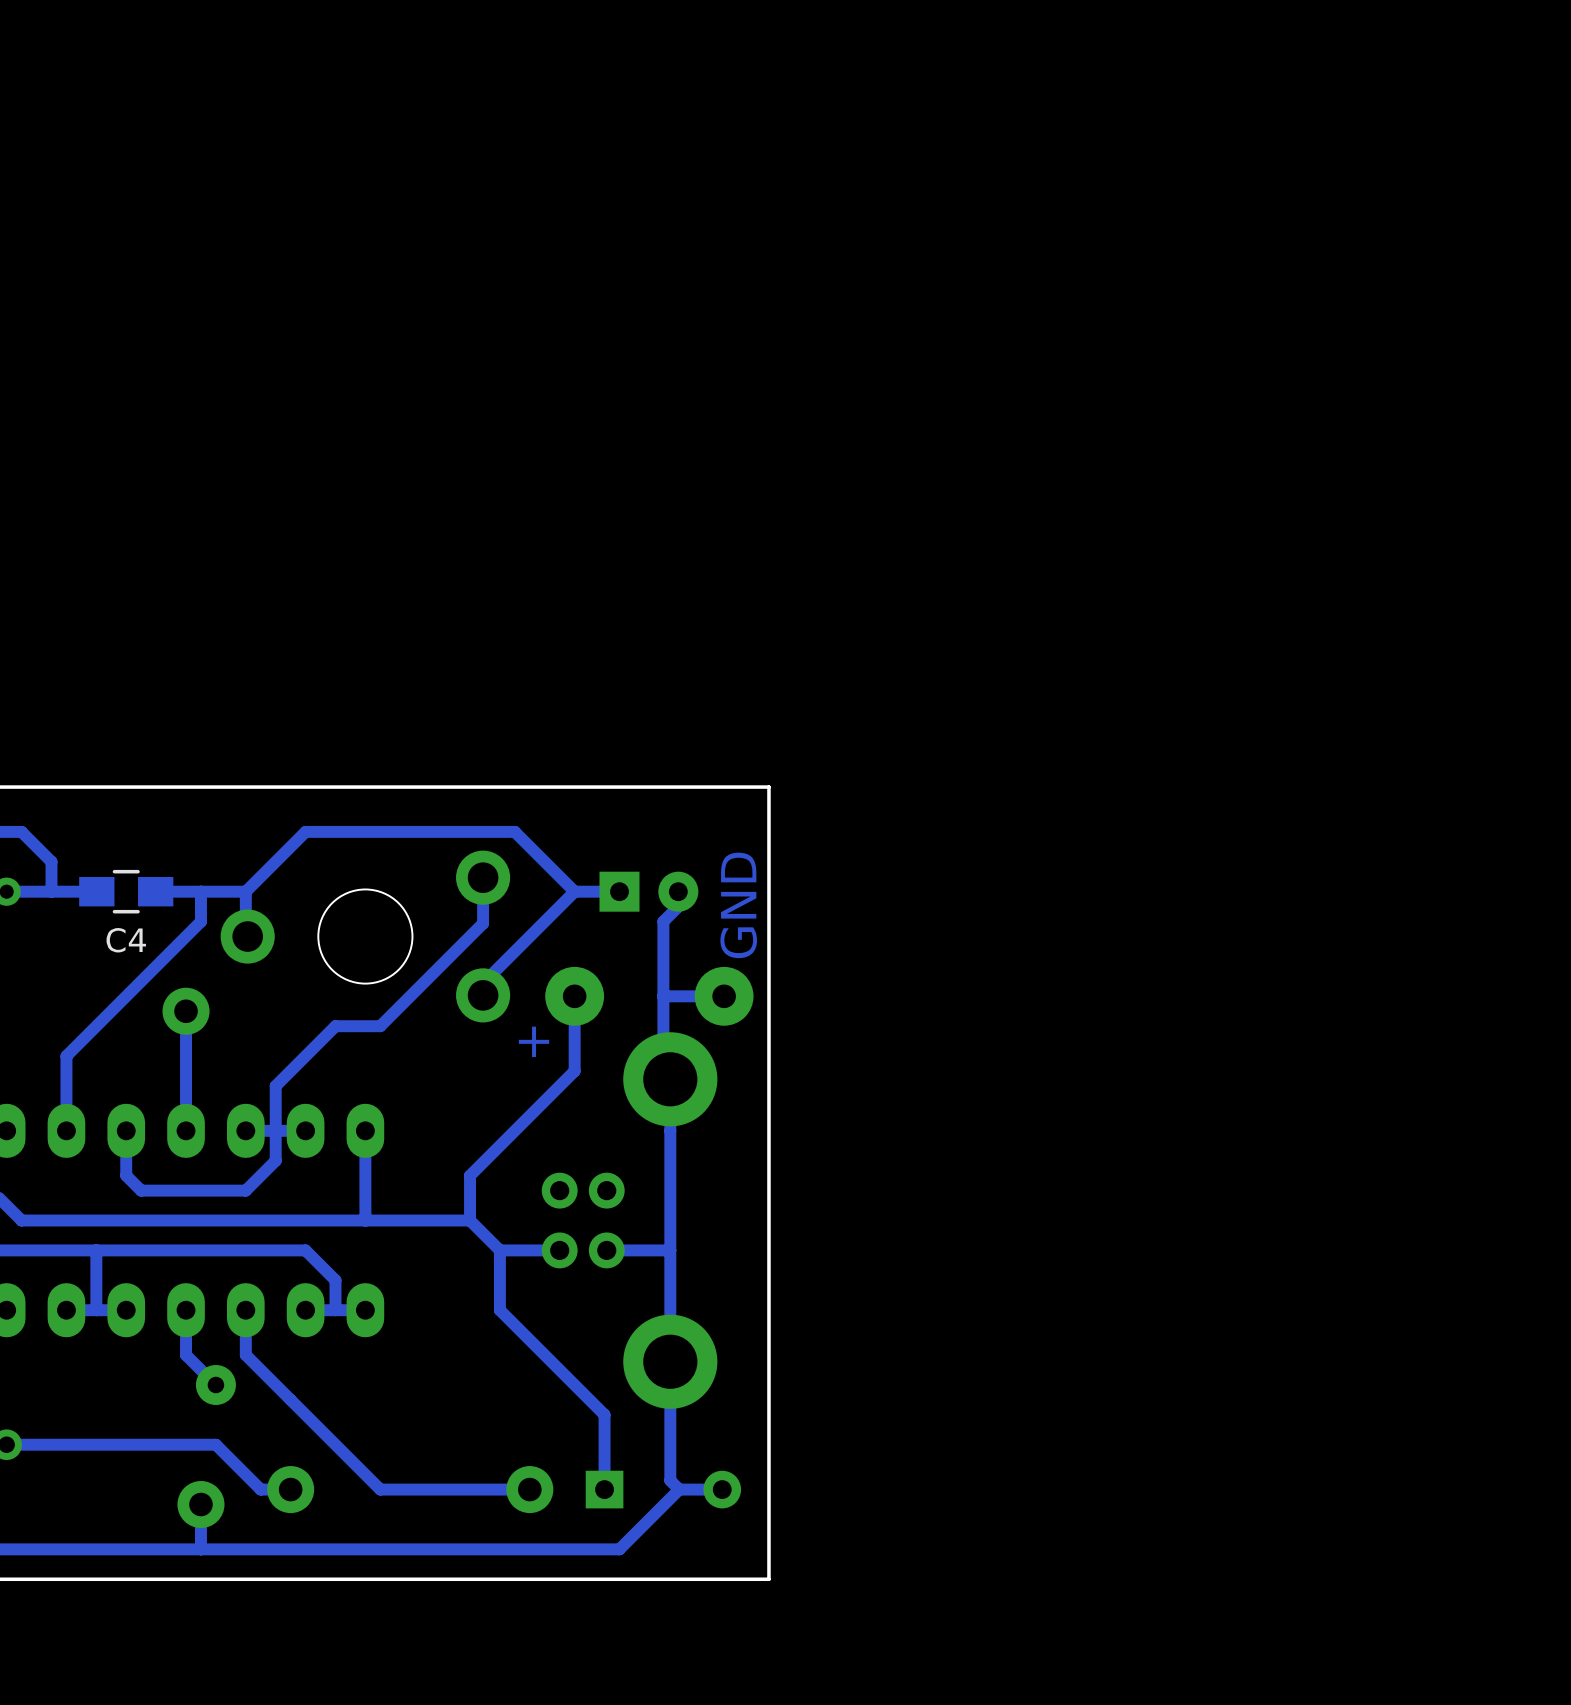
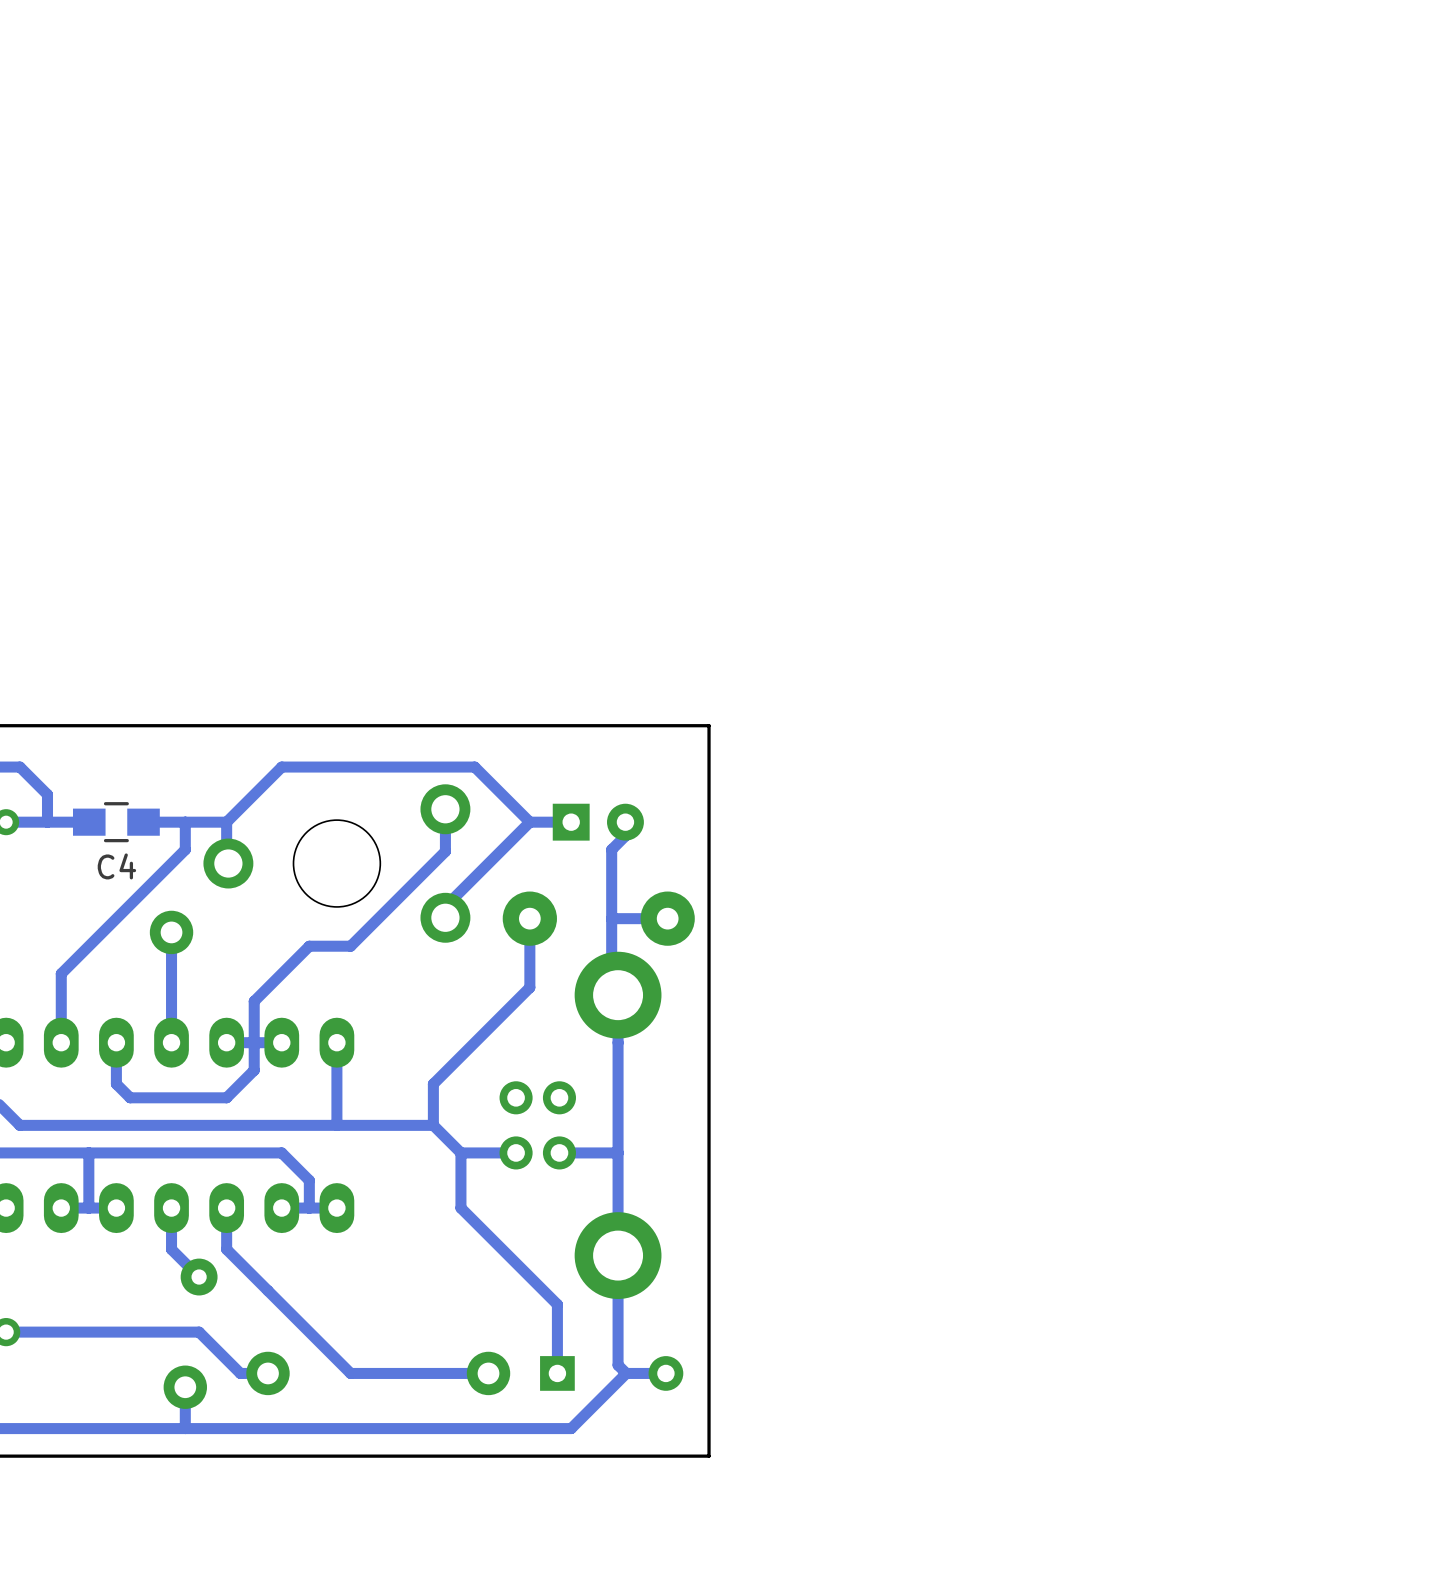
text: GND (738, 905) -> none
text: + (534, 1041) -> none

